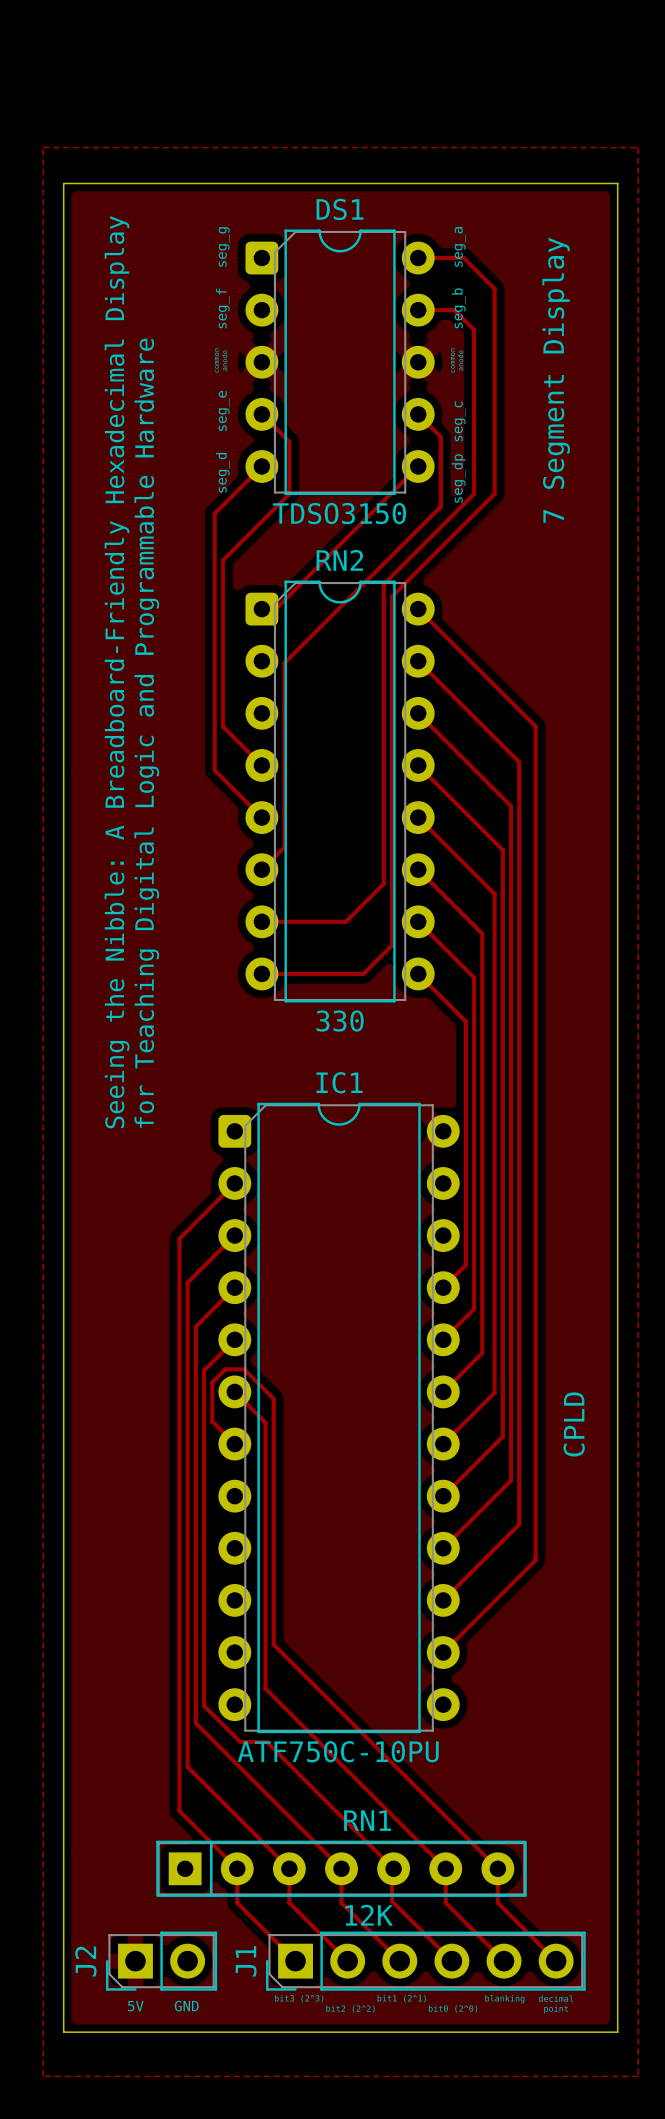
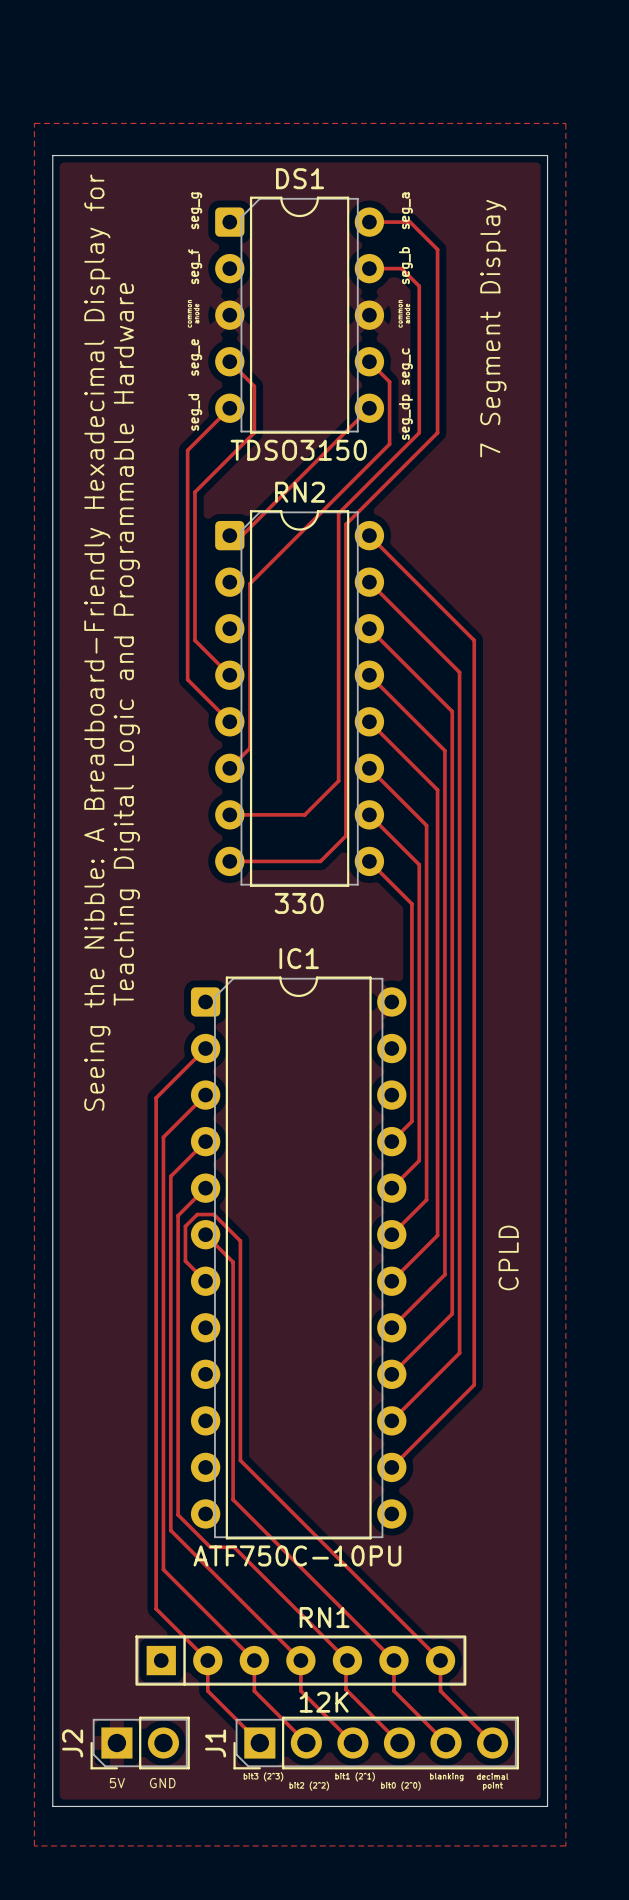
text: Seeing the Nibble: A Breadboard-Friendly Hexadecimal Display (117, 672) -> Seeing the Nibble: A Breadboard-Friendly Hexadecimal Display for (97, 642)
text: for Teaching Digital Logic and Programmable Hardware (146, 733) -> Teaching Digital Logic and Programmable Hardware (126, 644)

